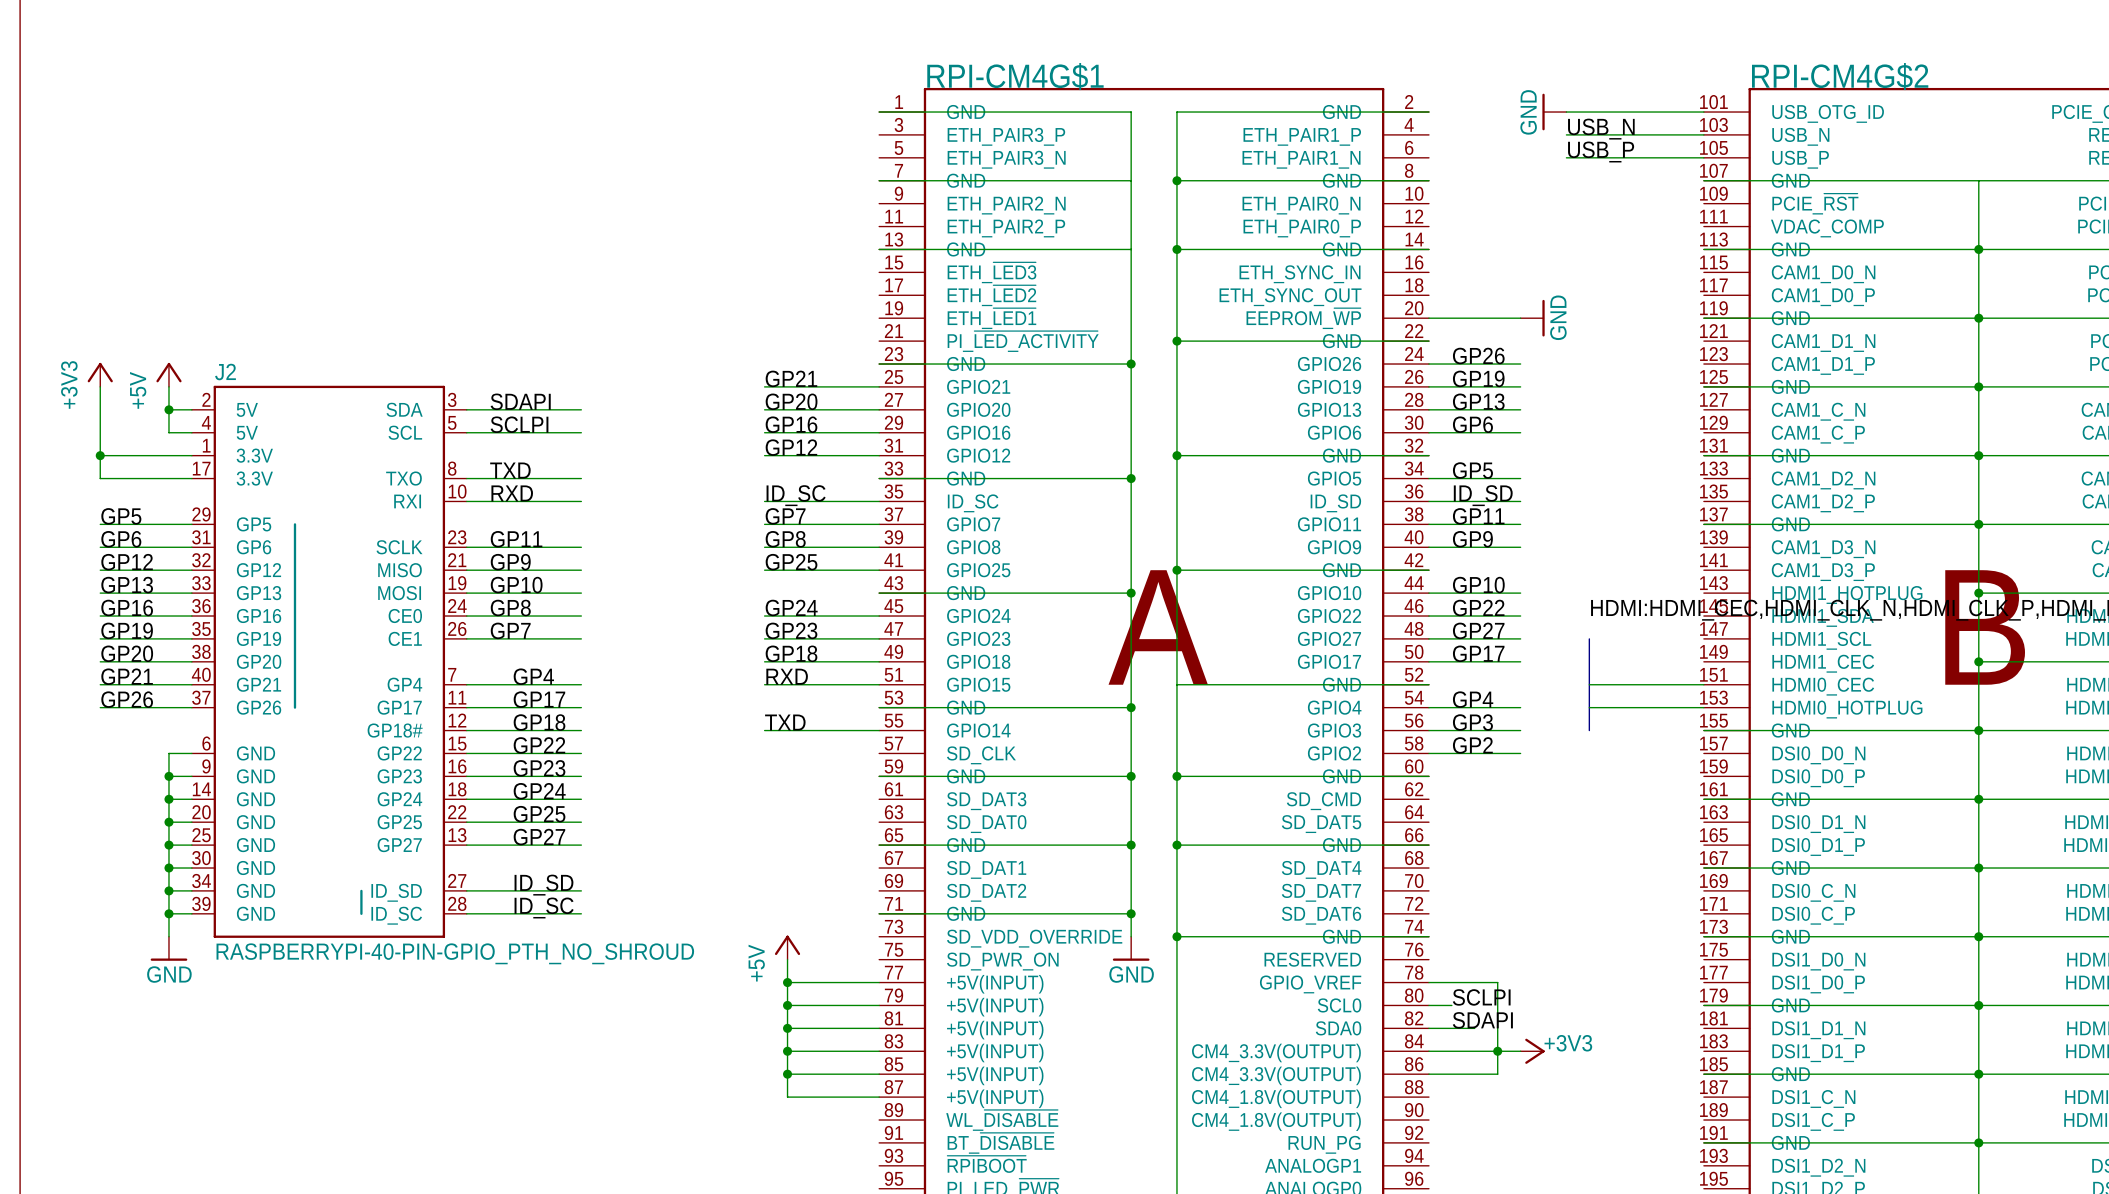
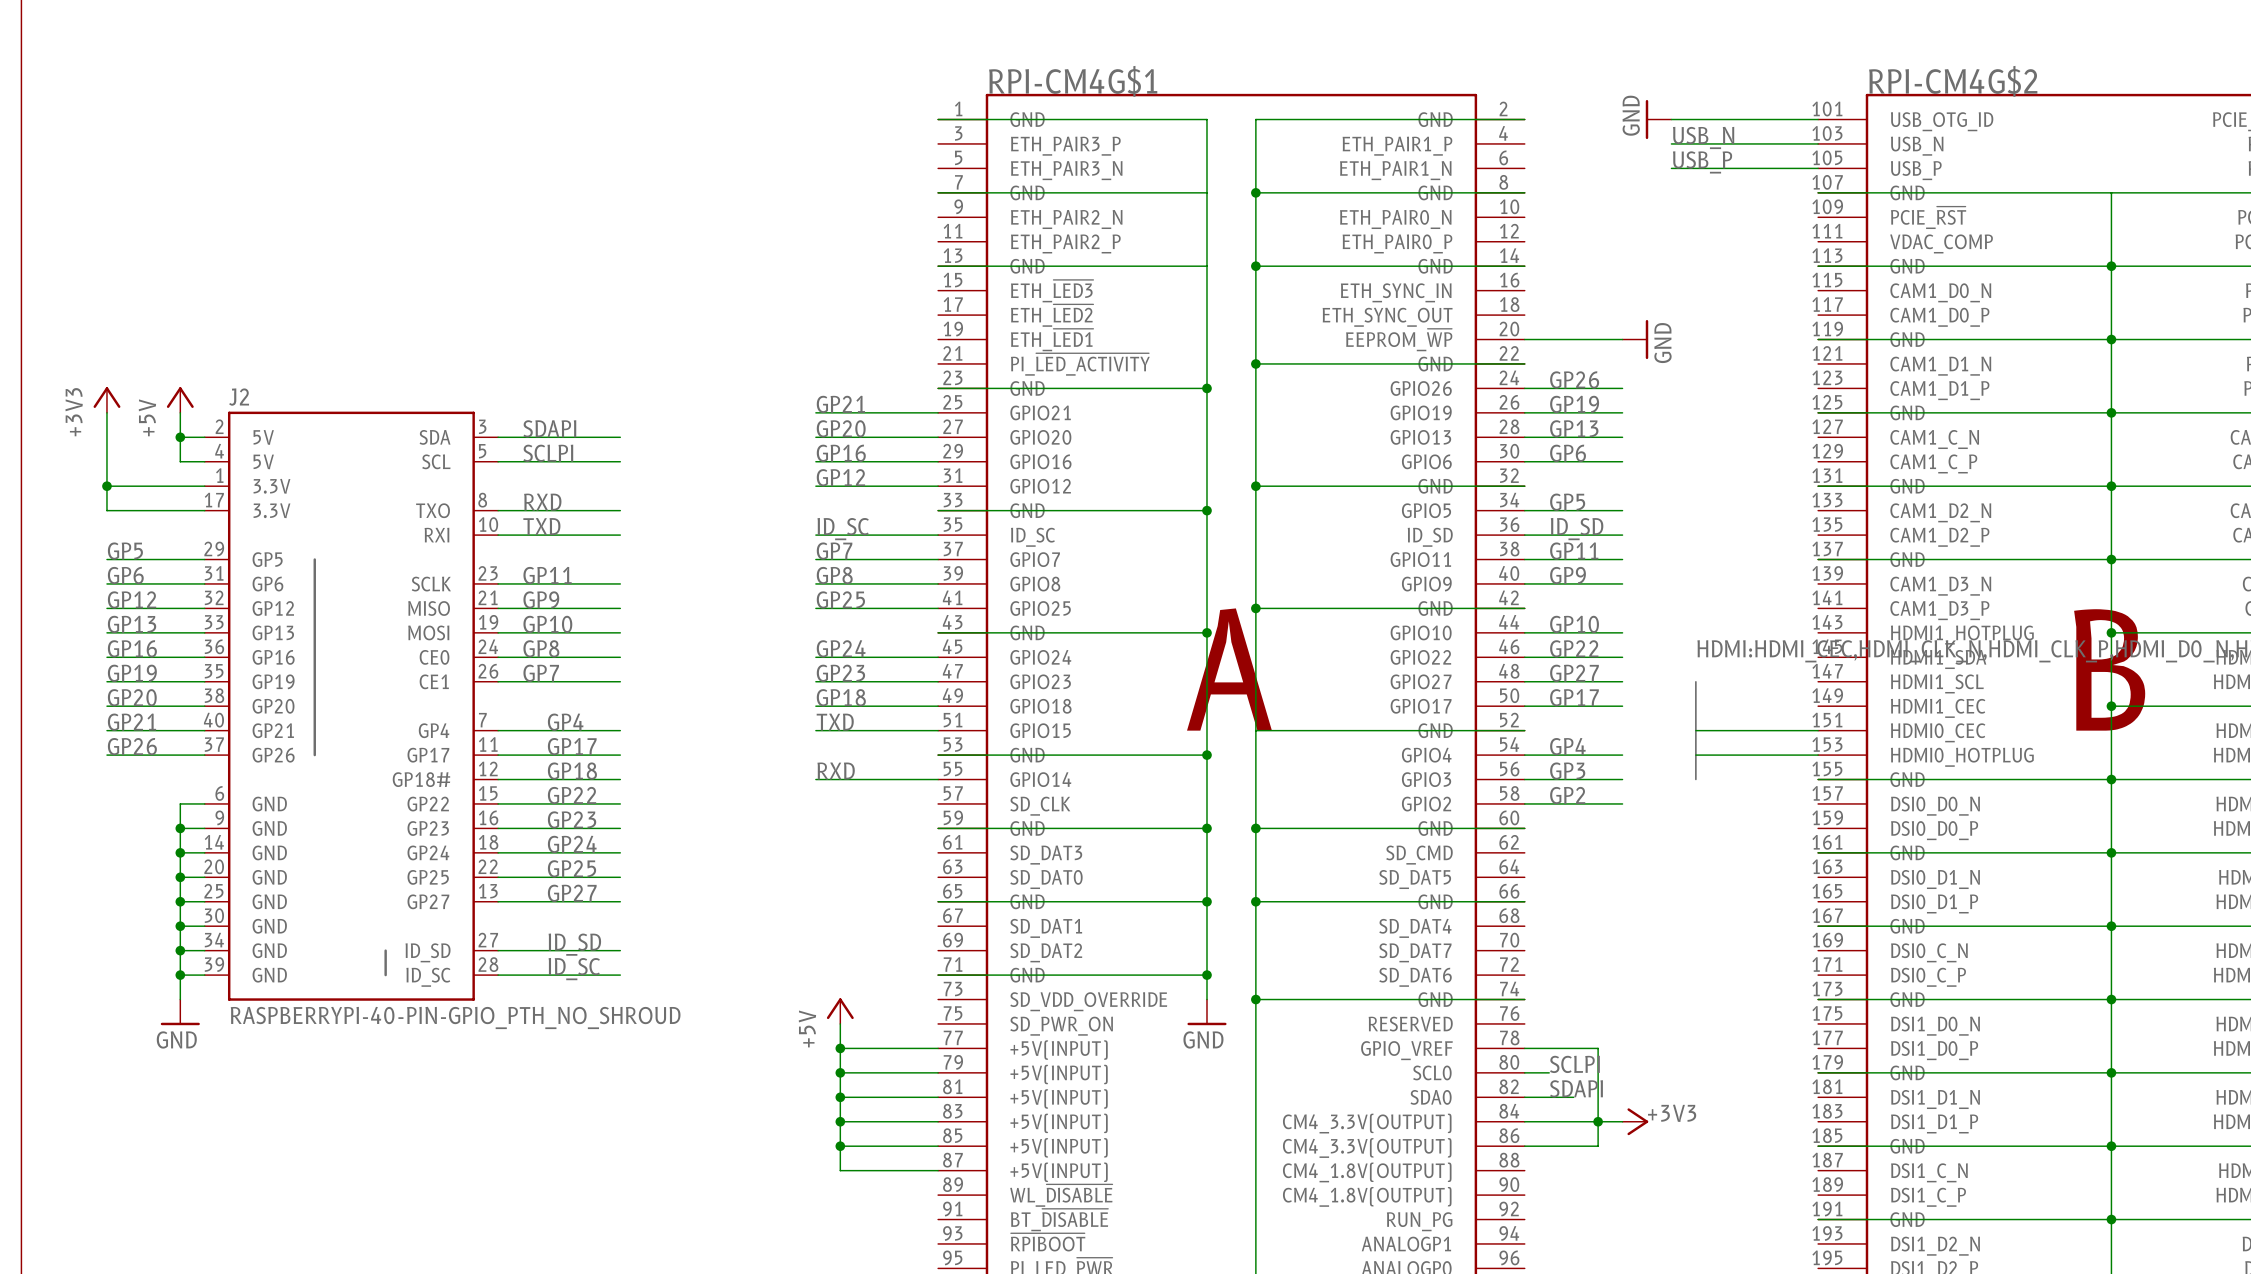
label: TXD (510, 470) -> RXD (542, 502)
label: RXD (512, 493) -> TXD (541, 526)
label: RXD (787, 676) -> TXD (835, 722)
label: TXD (785, 722) -> RXD (836, 770)

